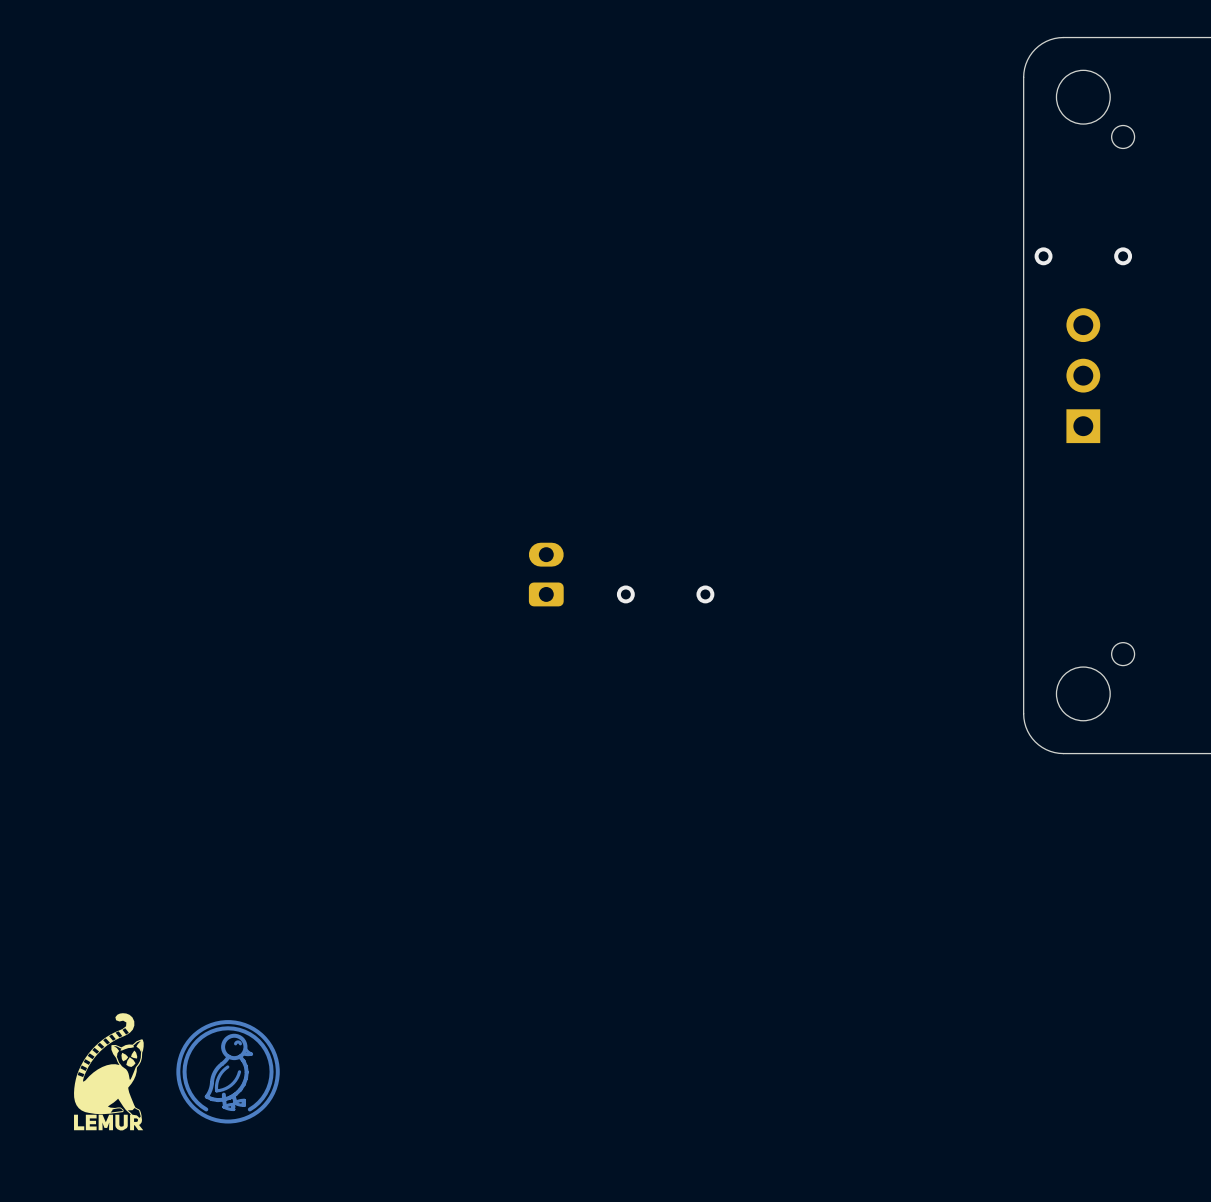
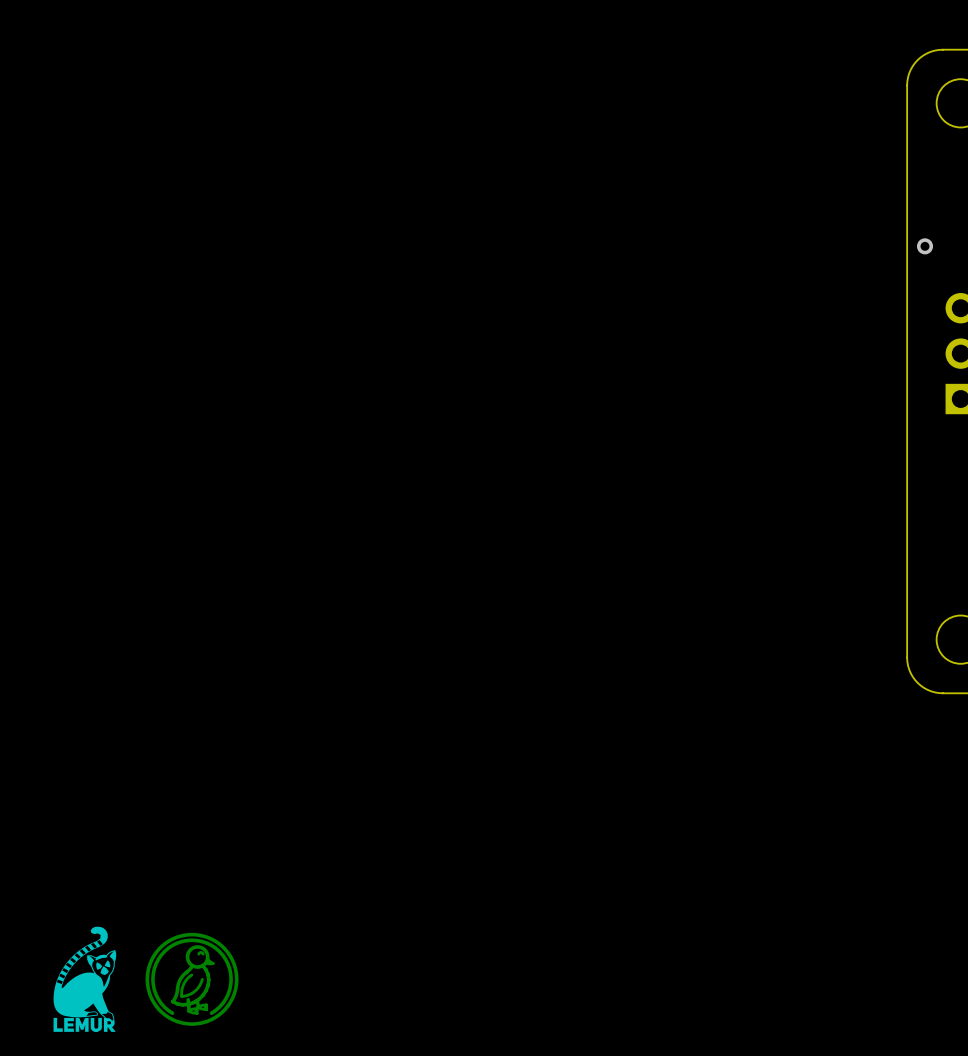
part: (546, 574) -> none
via: (625, 594) -> none
via: (705, 594) -> none

